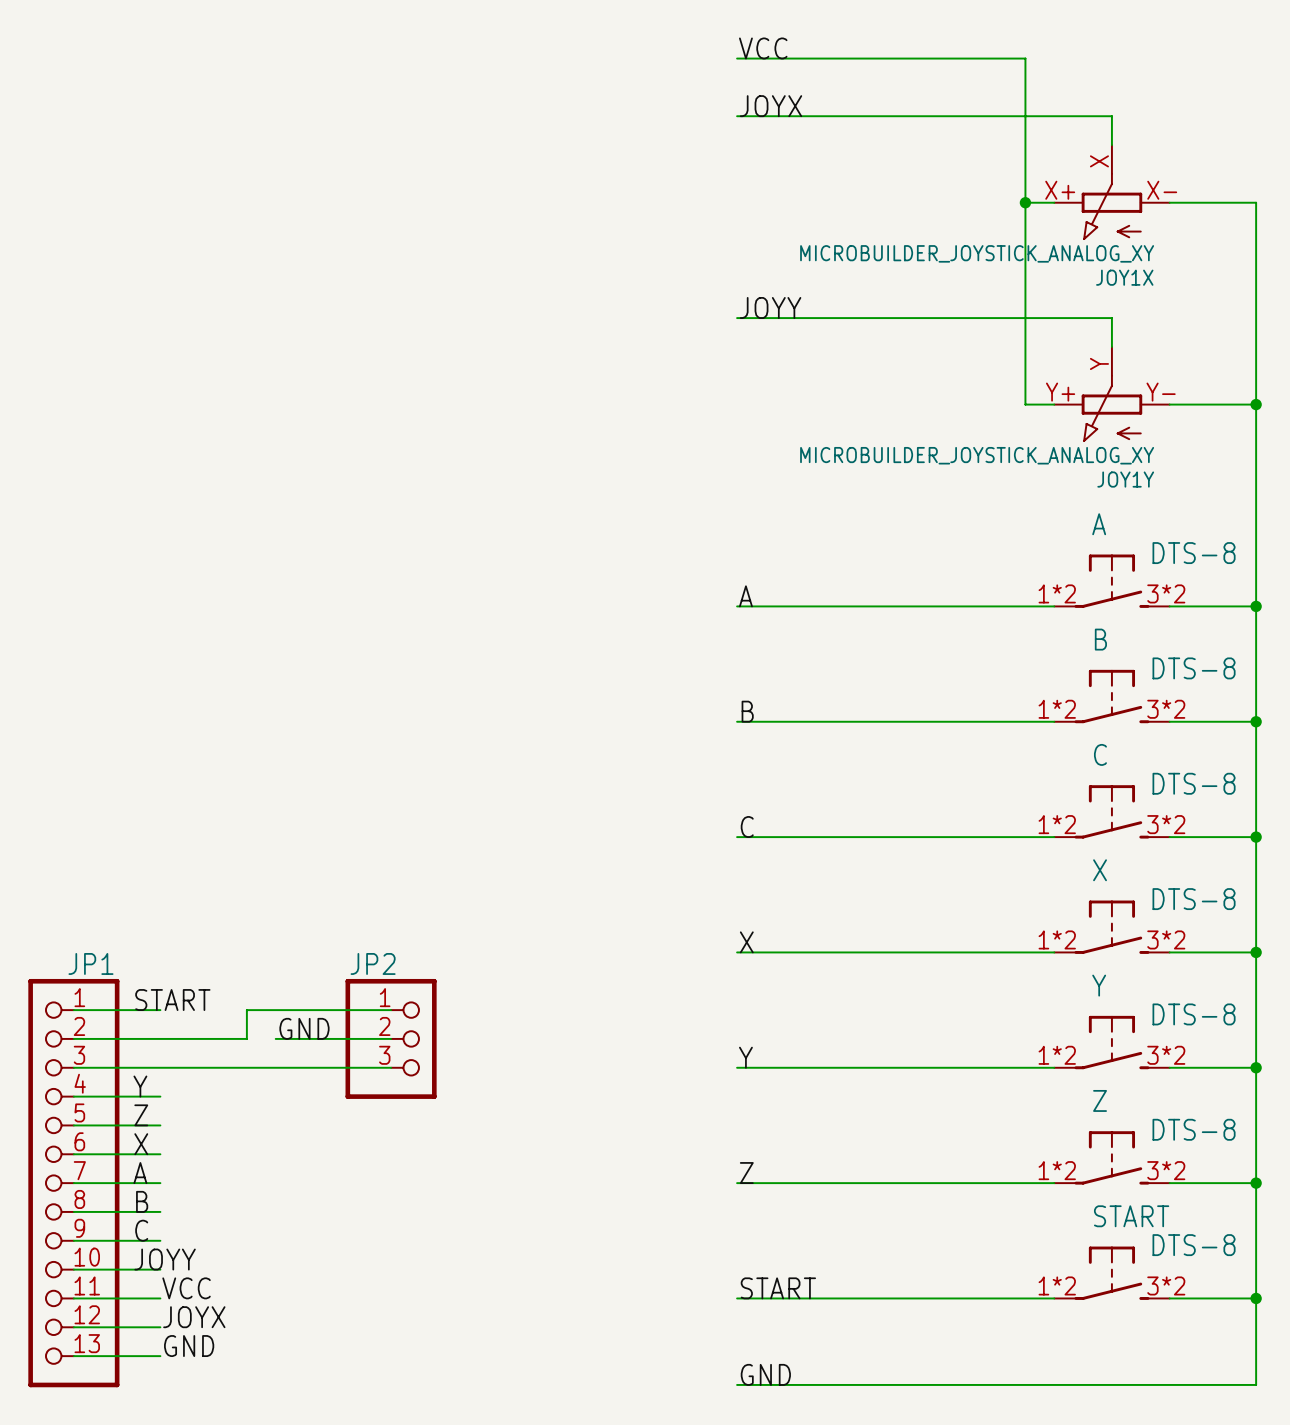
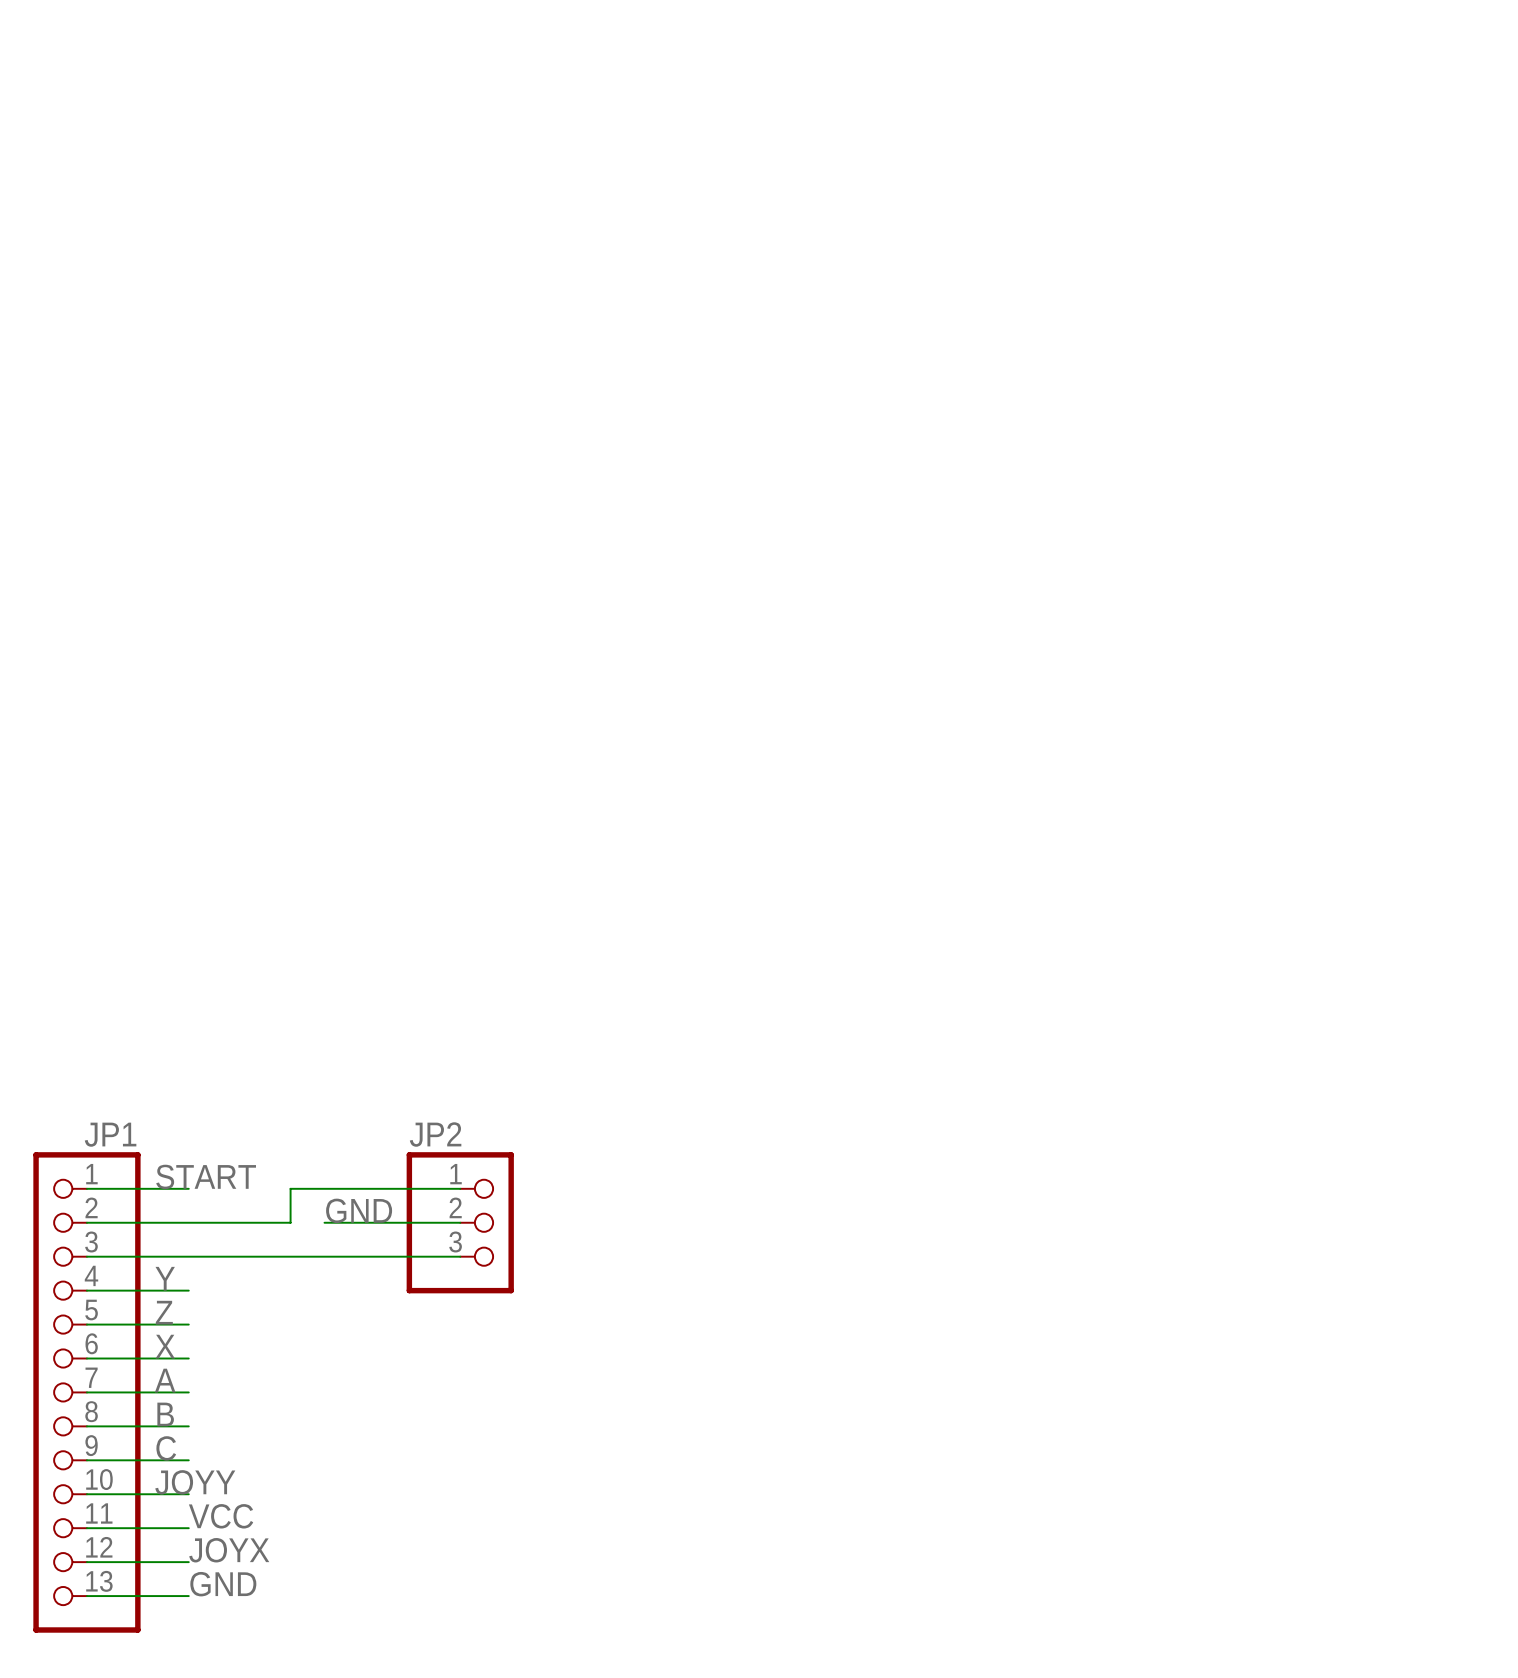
label: VCC (763, 48) -> none
wire: (737, 58) (1025, 58) (1025, 404) (1054, 404) -> none
label: JOYX (771, 106) -> none
wire: (737, 116) (1111, 116) (1111, 145) -> none
JOY1X: MICROBUILDER_JOYSTICK_ANALOG_XY (1111, 192) -> none
wire: (1025, 202) (1054, 202) -> none
junction: (1025, 202) -> none
wire: (1169, 202) (1256, 202) (1256, 1384) (737, 1384) -> none
label: JOYY (770, 307) -> none
wire: (737, 318) (1111, 318) (1111, 346) -> none
JOY1Y: MICROBUILDER_JOYSTICK_ANALOG_XY (1111, 394) -> none
wire: (1169, 404) (1256, 404) -> none
junction: (1256, 404) -> none
A: DTS-8 (1111, 581) -> none
label: A (745, 596) -> none
wire: (737, 606) (1054, 606) -> none
wire: (1169, 606) (1256, 606) -> none
junction: (1256, 606) -> none
B: DTS-8 (1111, 696) -> none
label: B (747, 711) -> none
wire: (737, 721) (1054, 721) -> none
wire: (1169, 721) (1256, 721) -> none
junction: (1256, 721) -> none
C: DTS-8 (1111, 811) -> none
label: C (747, 827) -> none
wire: (737, 837) (1054, 837) -> none
wire: (1169, 837) (1256, 837) -> none
junction: (1256, 837) -> none
X: DTS-8 (1111, 927) -> none
label: X (746, 942) -> none
wire: (737, 952) (1054, 952) -> none
wire: (1169, 952) (1256, 952) -> none
junction: (1256, 952) -> none
Y: DTS-8 (1111, 1042) -> none
label: Y (745, 1057) -> none
wire: (737, 1067) (1054, 1067) -> none
wire: (1169, 1067) (1256, 1067) -> none
junction: (1256, 1067) -> none
Z: DTS-8 (1111, 1157) -> none
label: Z (746, 1173) -> none
wire: (737, 1183) (1054, 1183) -> none
wire: (1169, 1183) (1256, 1183) -> none
junction: (1256, 1183) -> none
START: DTS-8 (1111, 1273) -> none
label: START (778, 1288) -> none
wire: (737, 1298) (1054, 1298) -> none
wire: (1169, 1298) (1256, 1298) -> none
junction: (1256, 1298) -> none
label: GND (765, 1374) -> none

